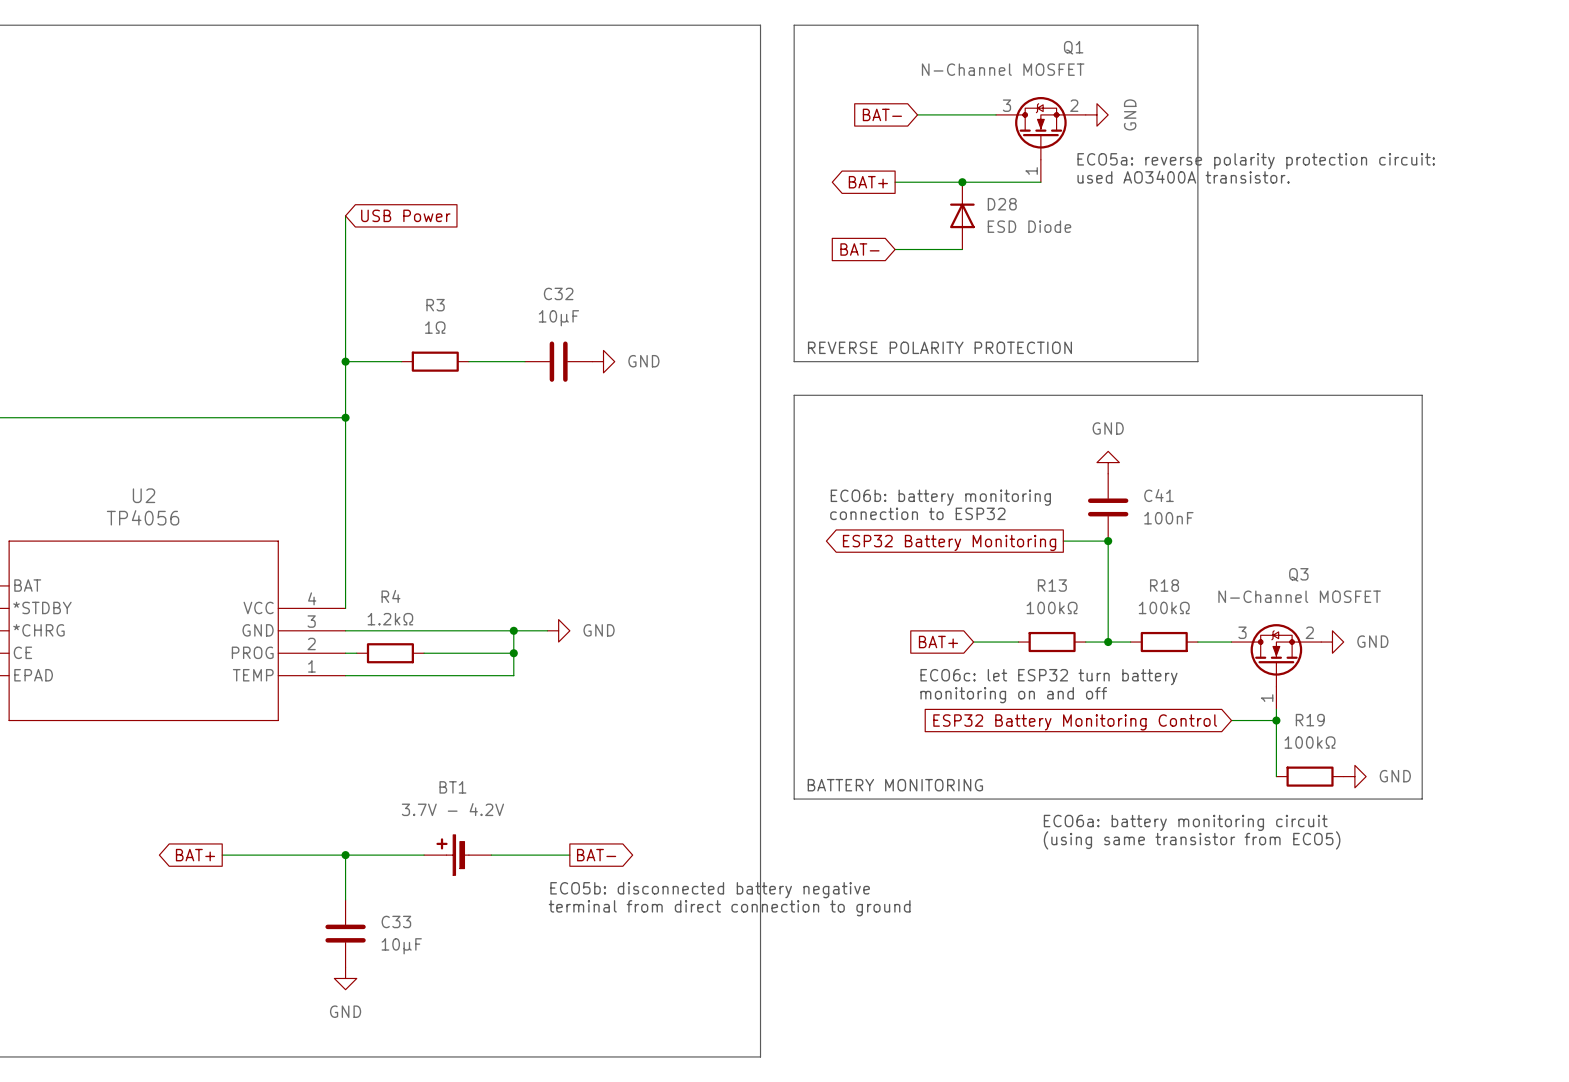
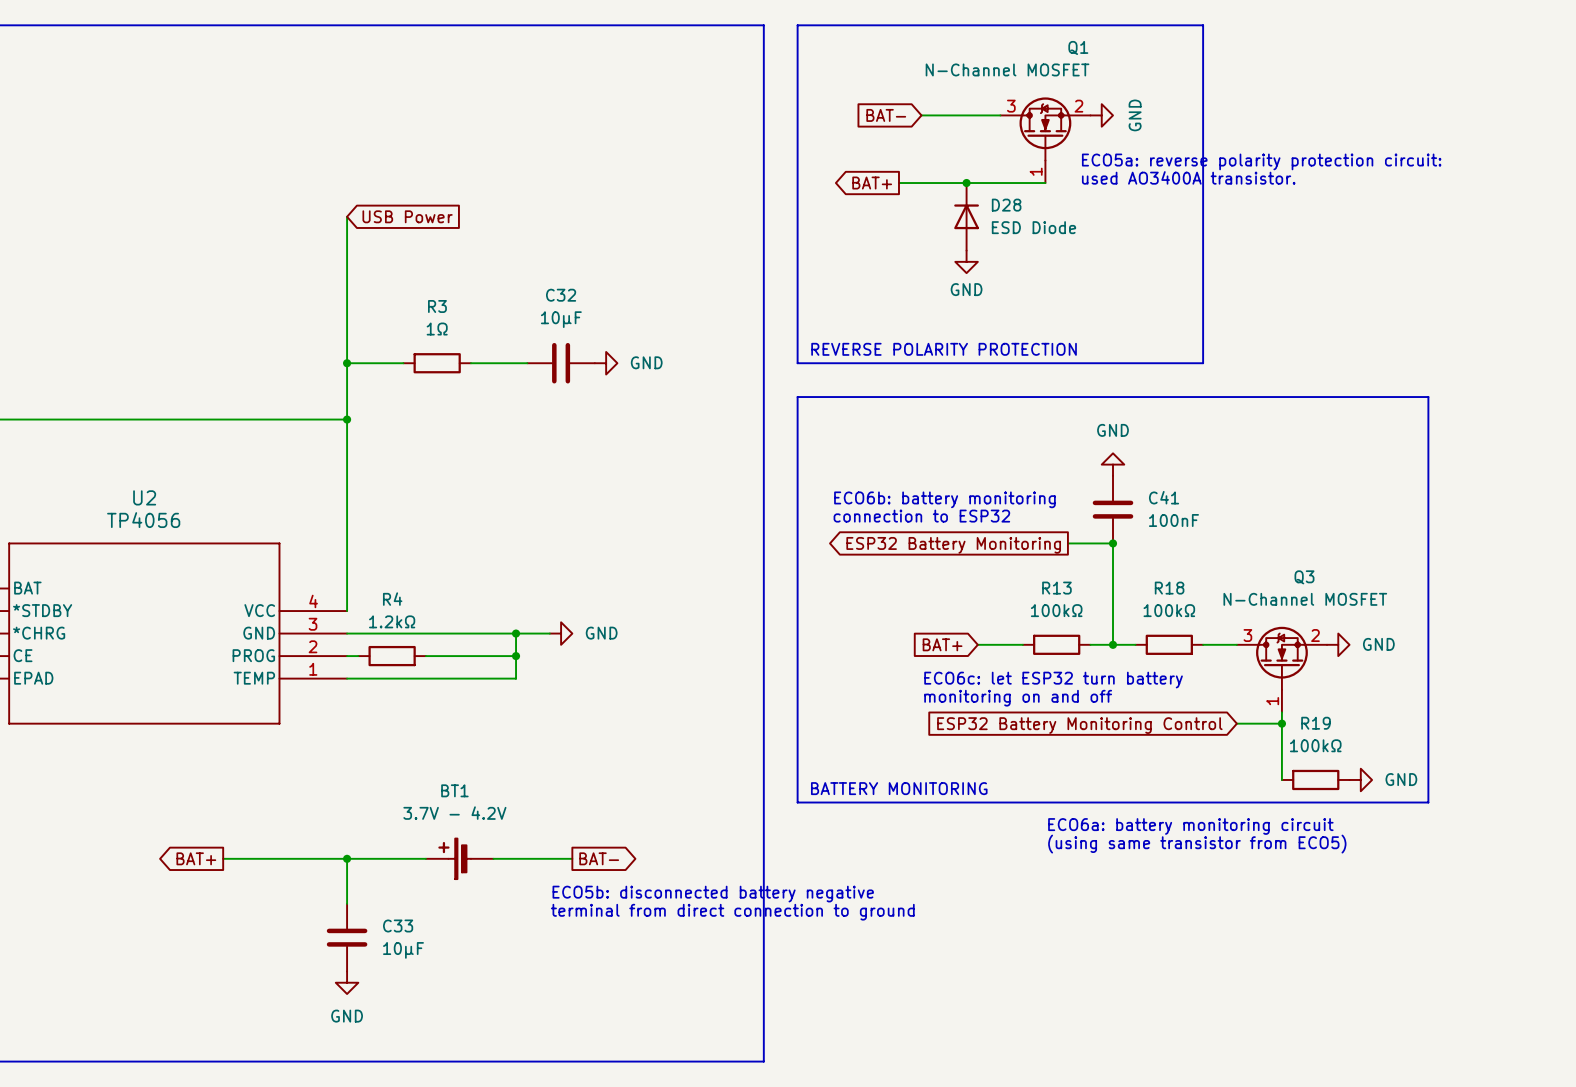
global label: BAT- (859, 249) -> none
wire: (895, 249) (962, 249) -> none
power symbol: none -> GND (966, 261)

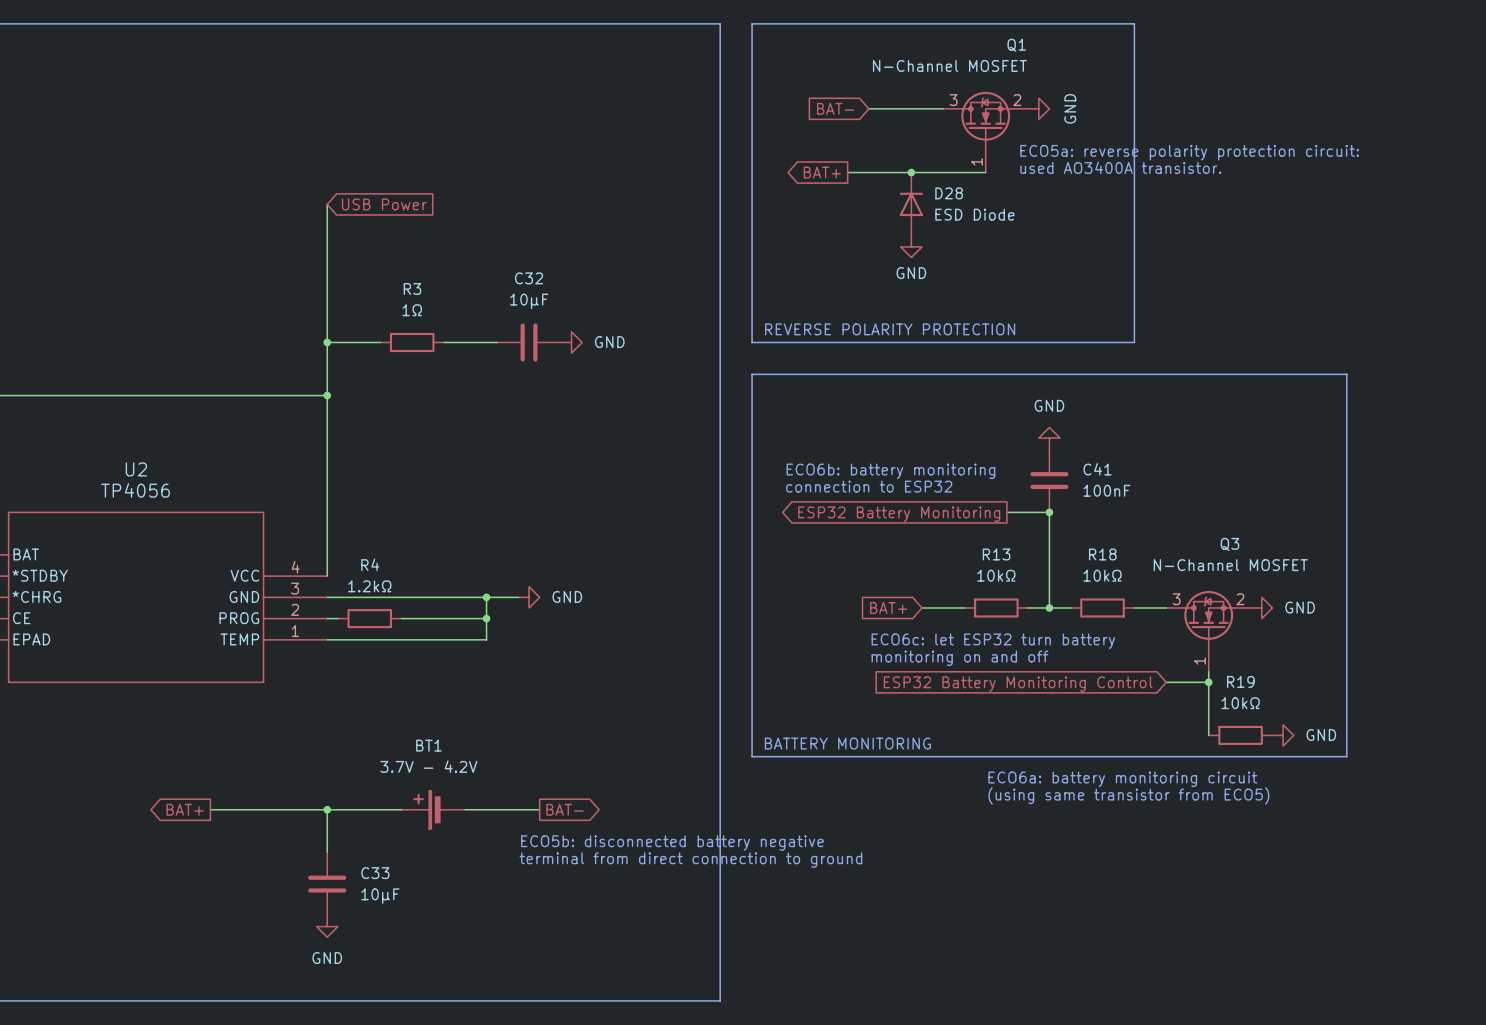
R13 value: 100kΩ (1056, 610) -> 10kΩ (996, 575)
R18 value: 100kΩ (1169, 610) -> 10kΩ (1102, 575)
R19 value: 100kΩ (1315, 745) -> 10kΩ (1240, 703)

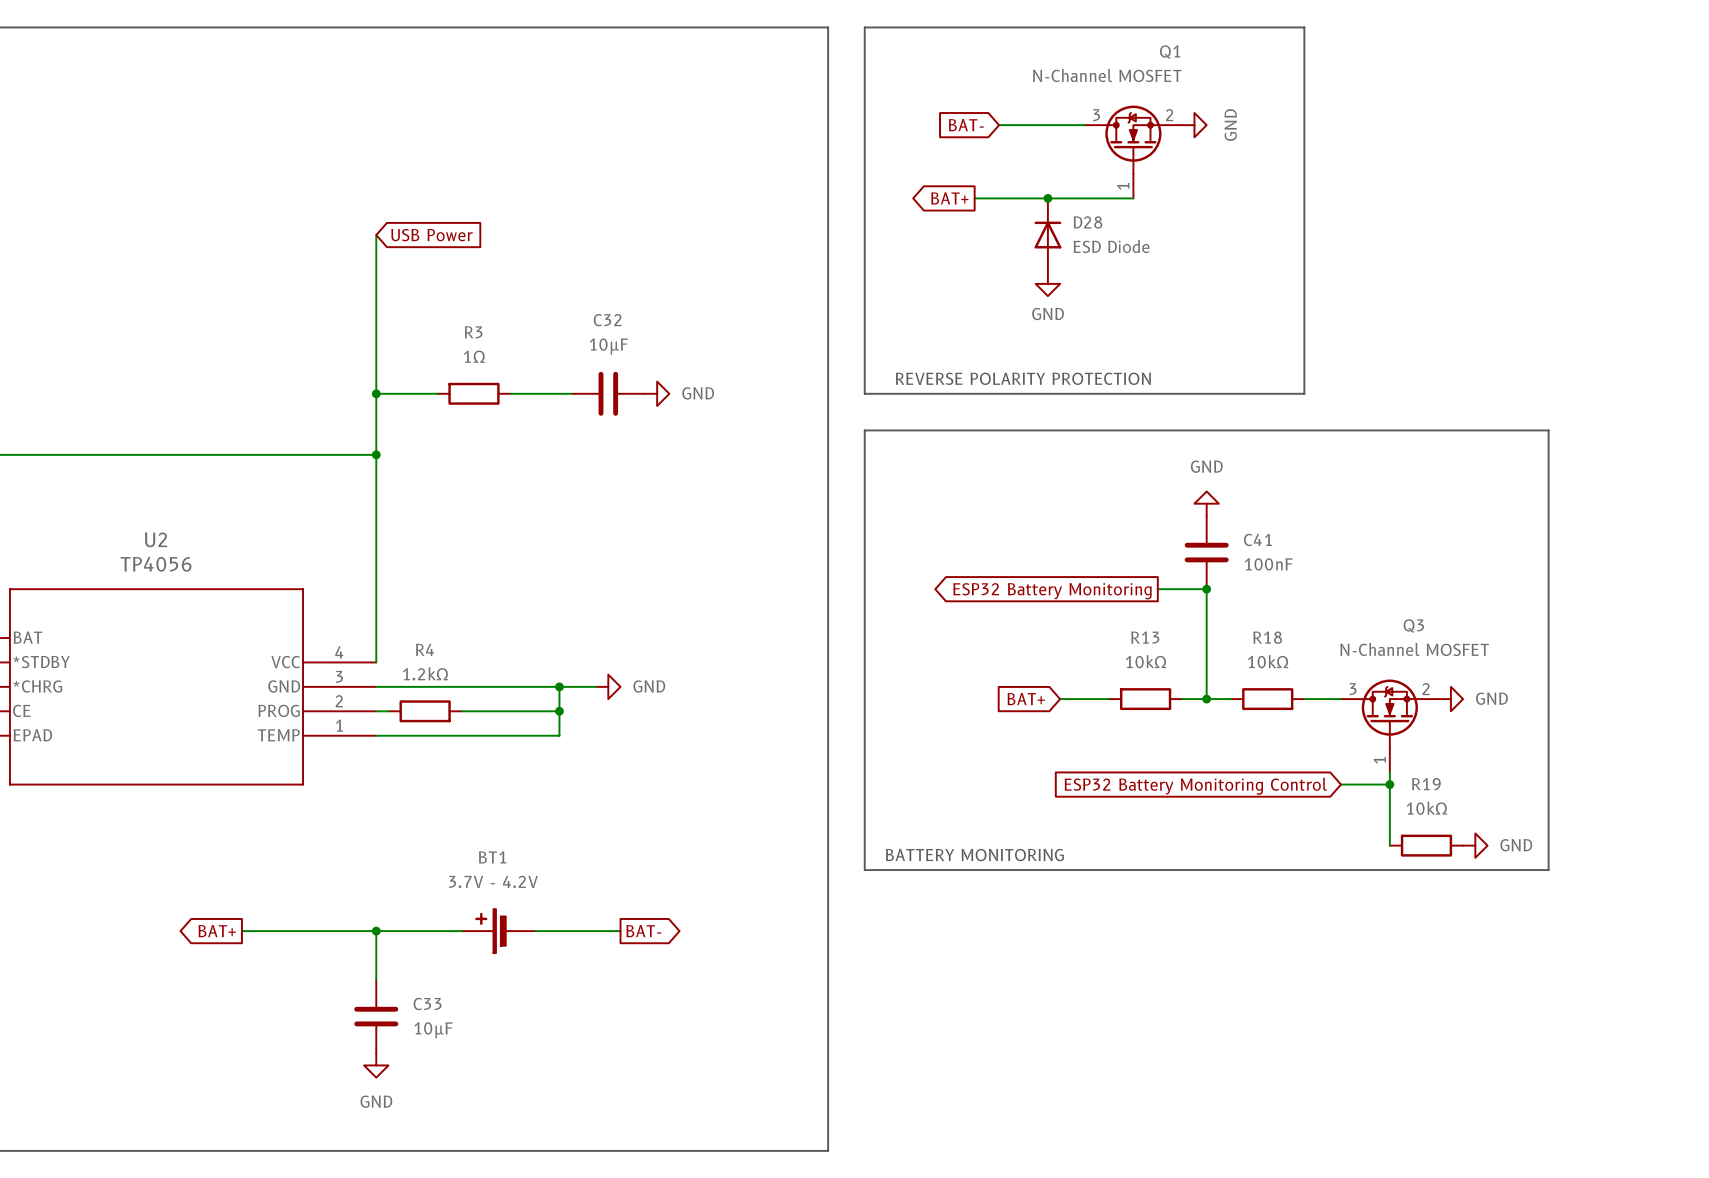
text: ECO5a: reverse polarity protection circuit: (1189, 152) -> none
text: used AO3400A transistor. (1120, 167) -> none
text: ECO6b: battery monitoring (890, 471) -> none
text: connection to ESP32 (869, 486) -> none
text: ECO6c: let ESP32 turn battery (993, 641) -> none
text: monitoring on and off (959, 658) -> none
text: ECO6a: battery monitoring circuit (1122, 779) -> none
text: (using same transistor from ECO5) (1128, 795) -> none
text: ECO5b: disconnected battery negative (672, 842) -> none
text: terminal from direct connection to ground (690, 860) -> none

